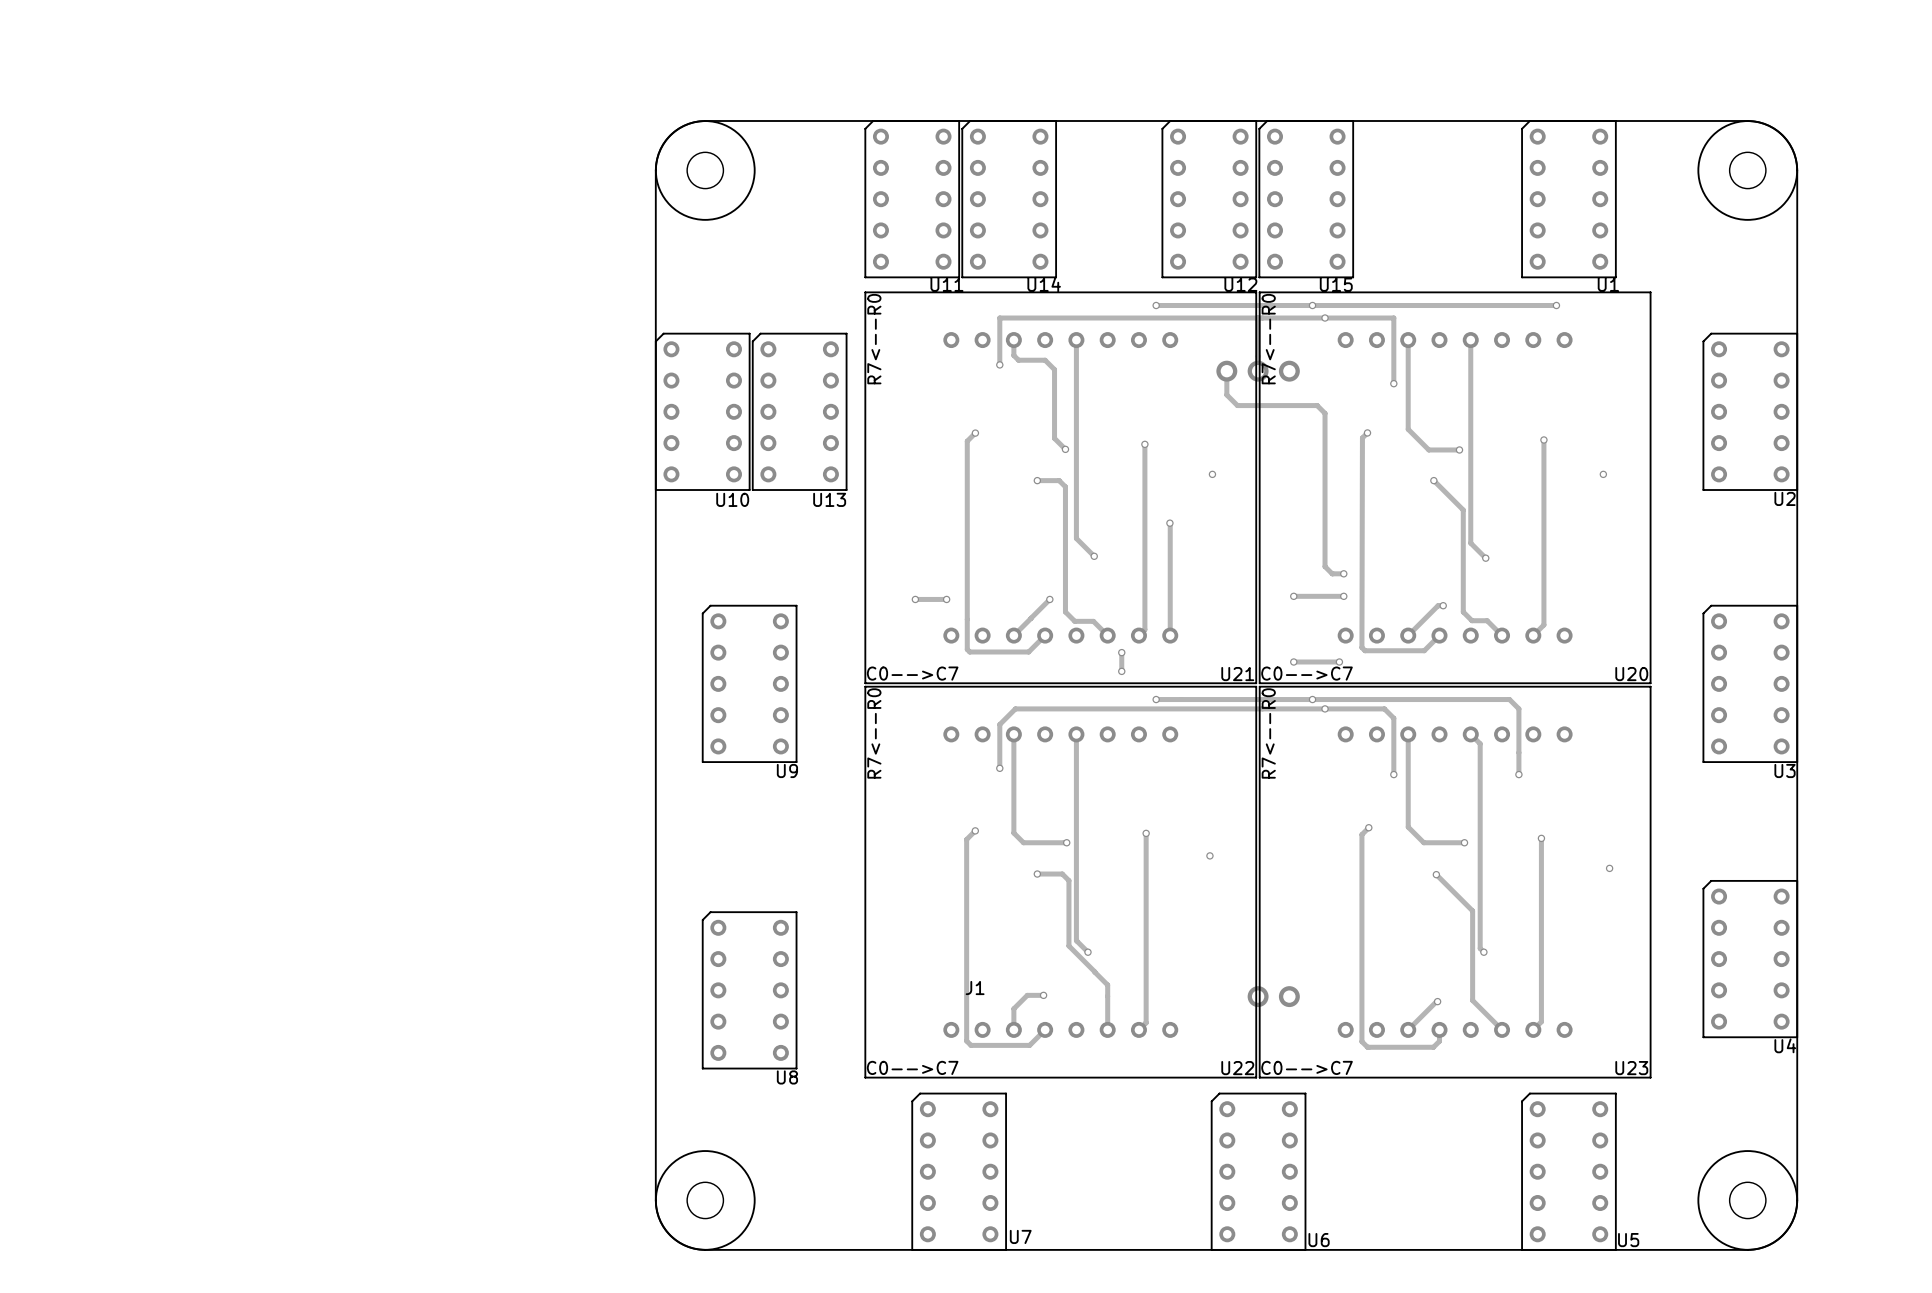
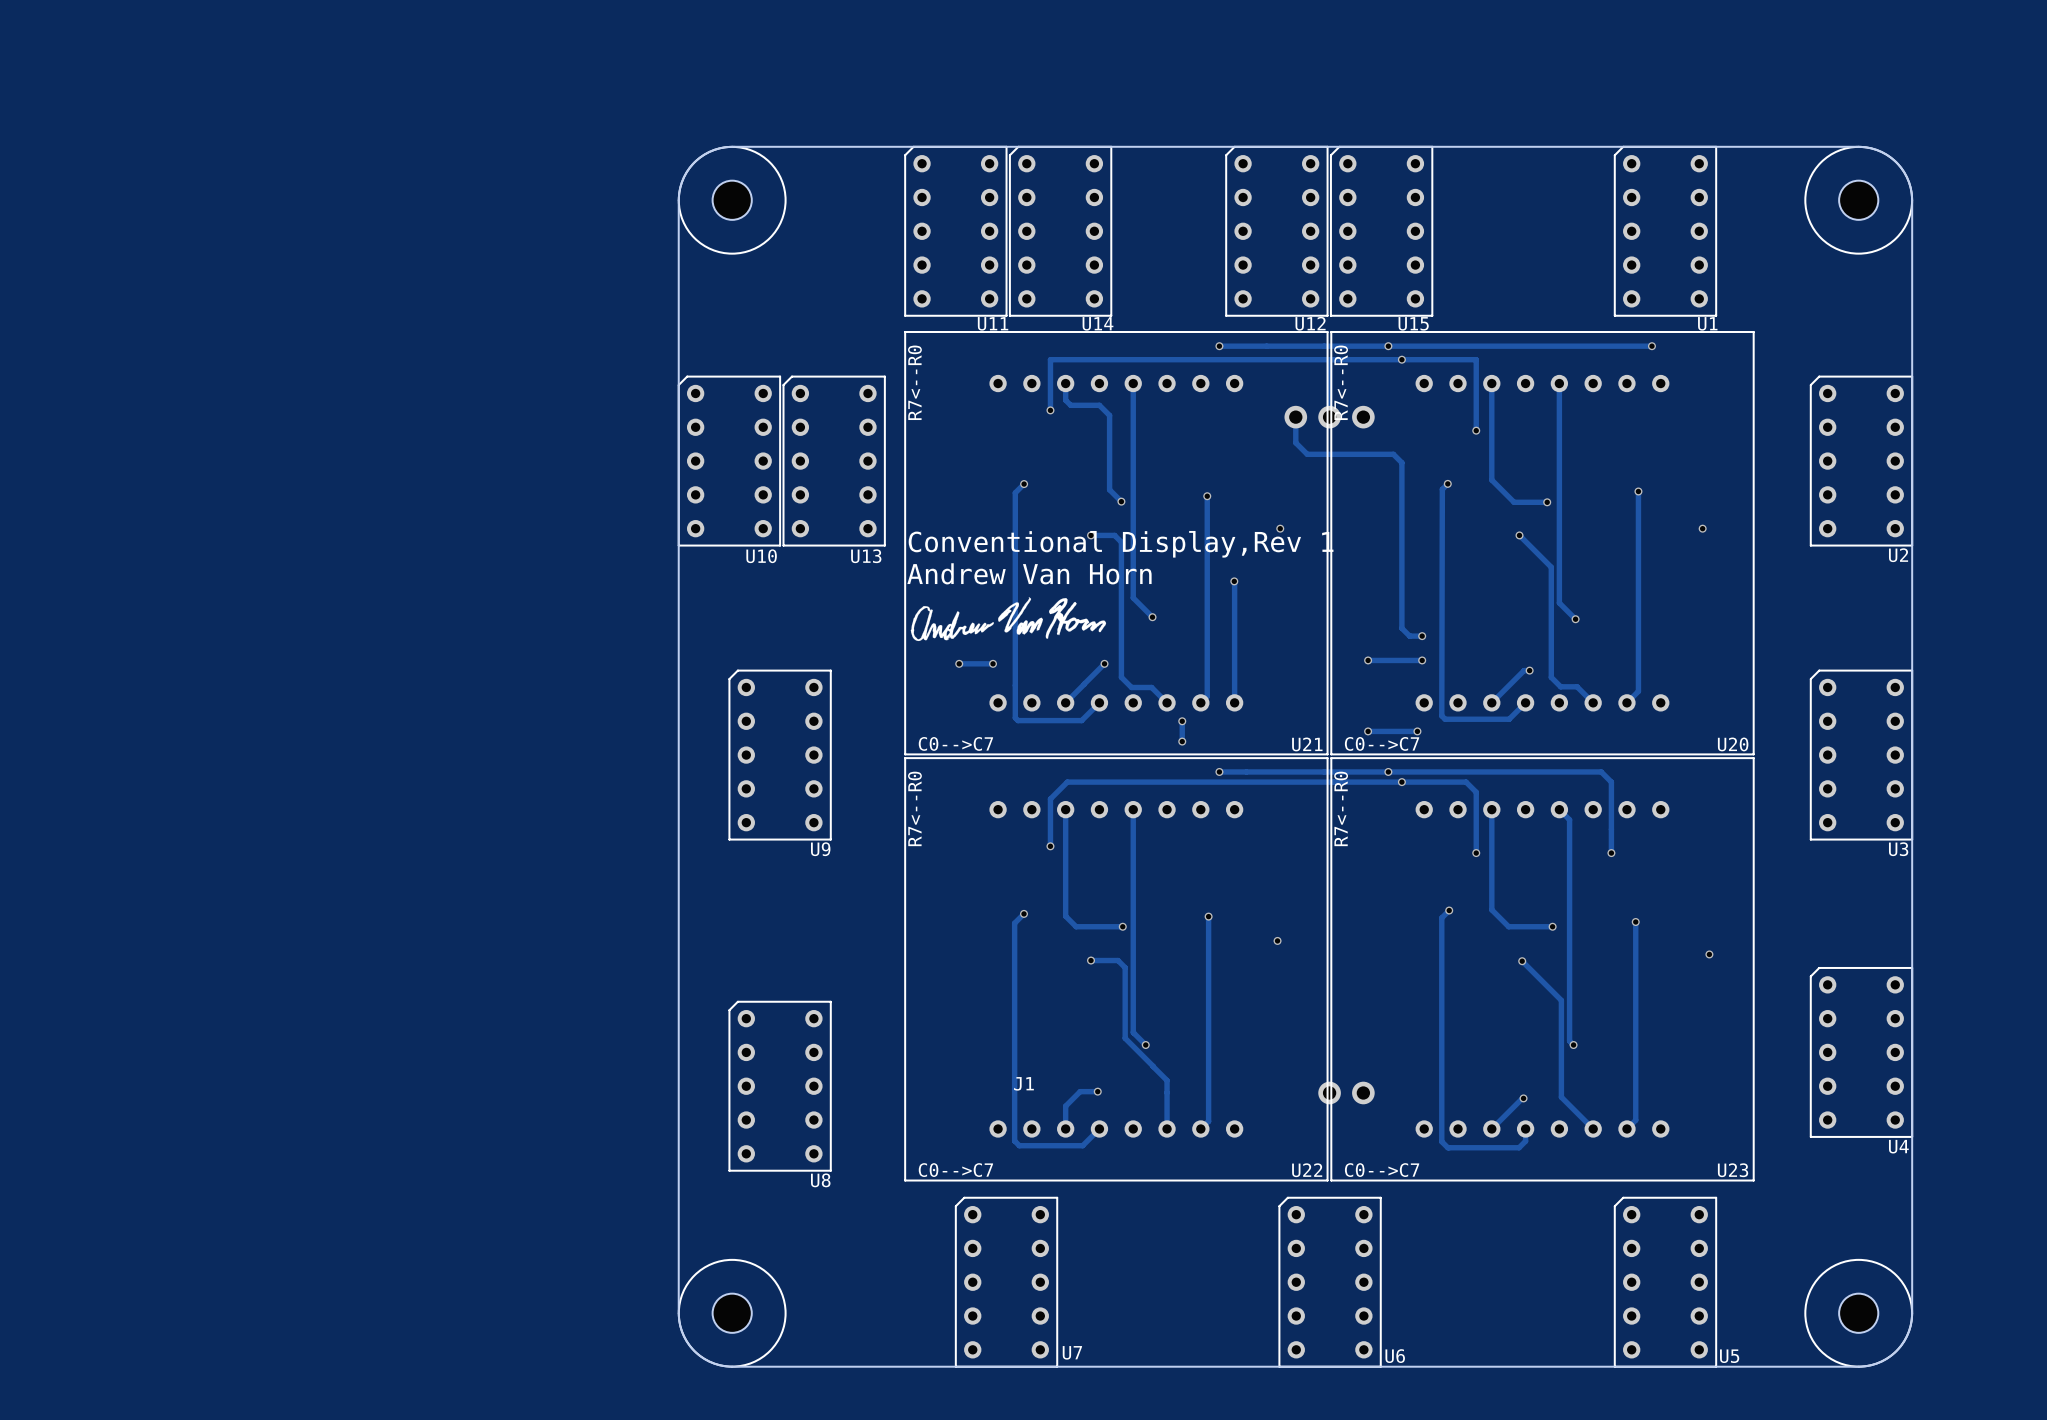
text: none -> Conventional Display,Rev 1 (1121, 544)
text: none -> Andrew Van Horn (1029, 573)
drawing: none -> [910, 597, 1107, 642]

